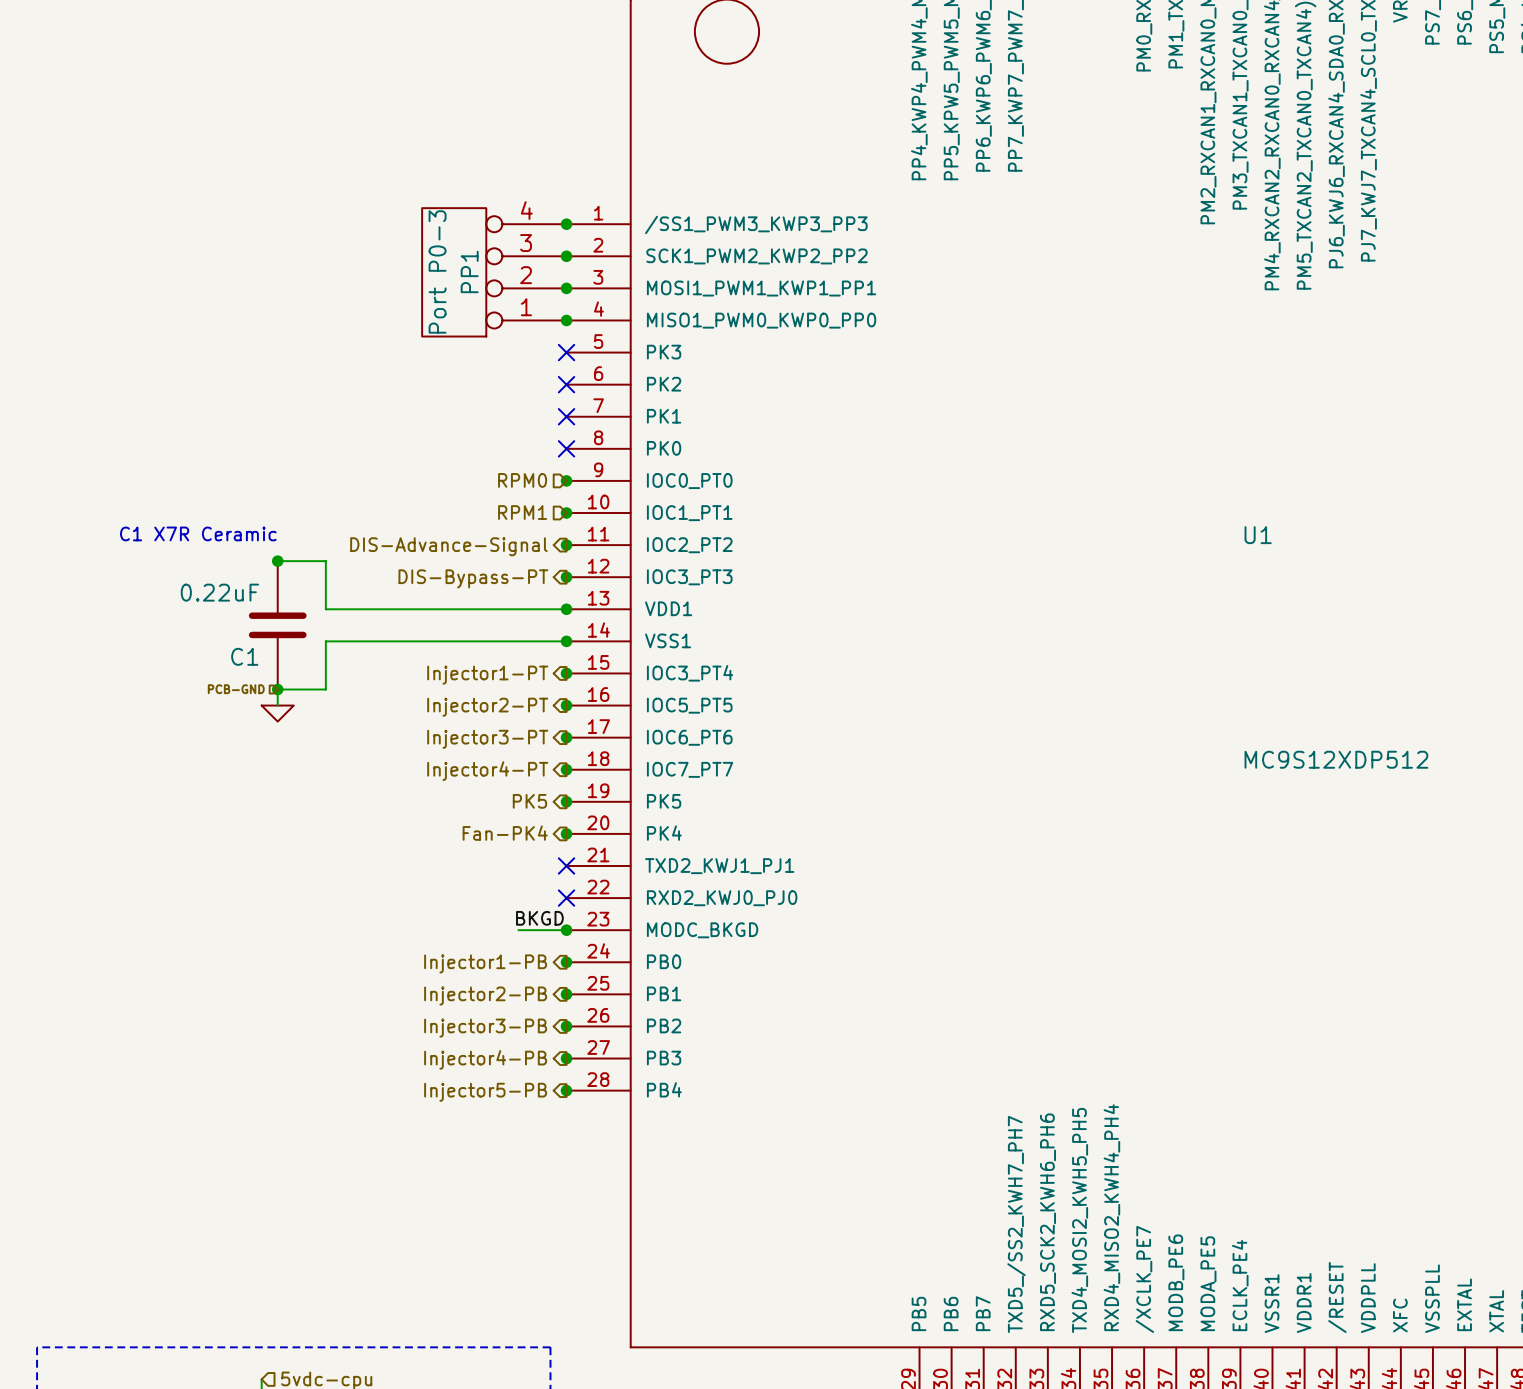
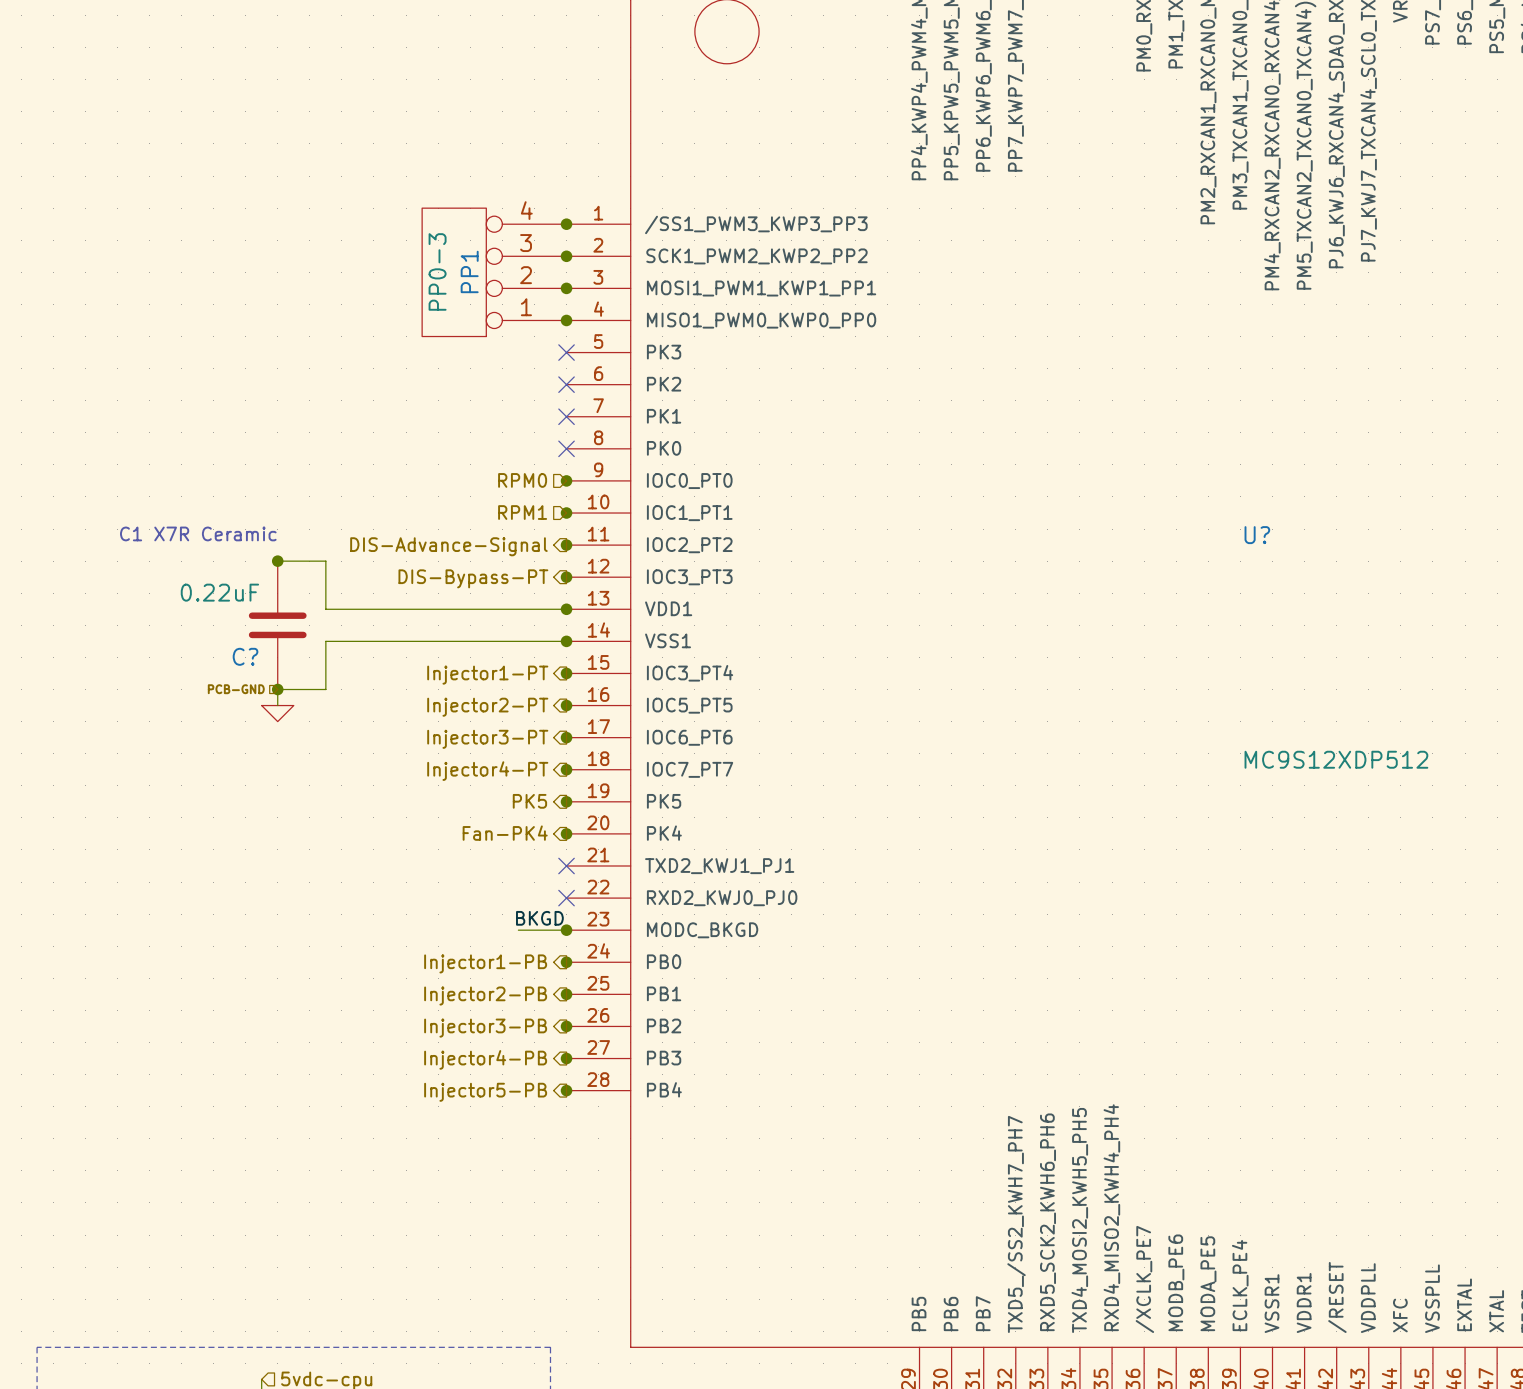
PP1 value: Port P0-3 (437, 271) -> PP0-3 (437, 271)
U1 name: U1 (1258, 535) -> U? (1257, 535)
C1 name: C1 (244, 656) -> C? (245, 656)

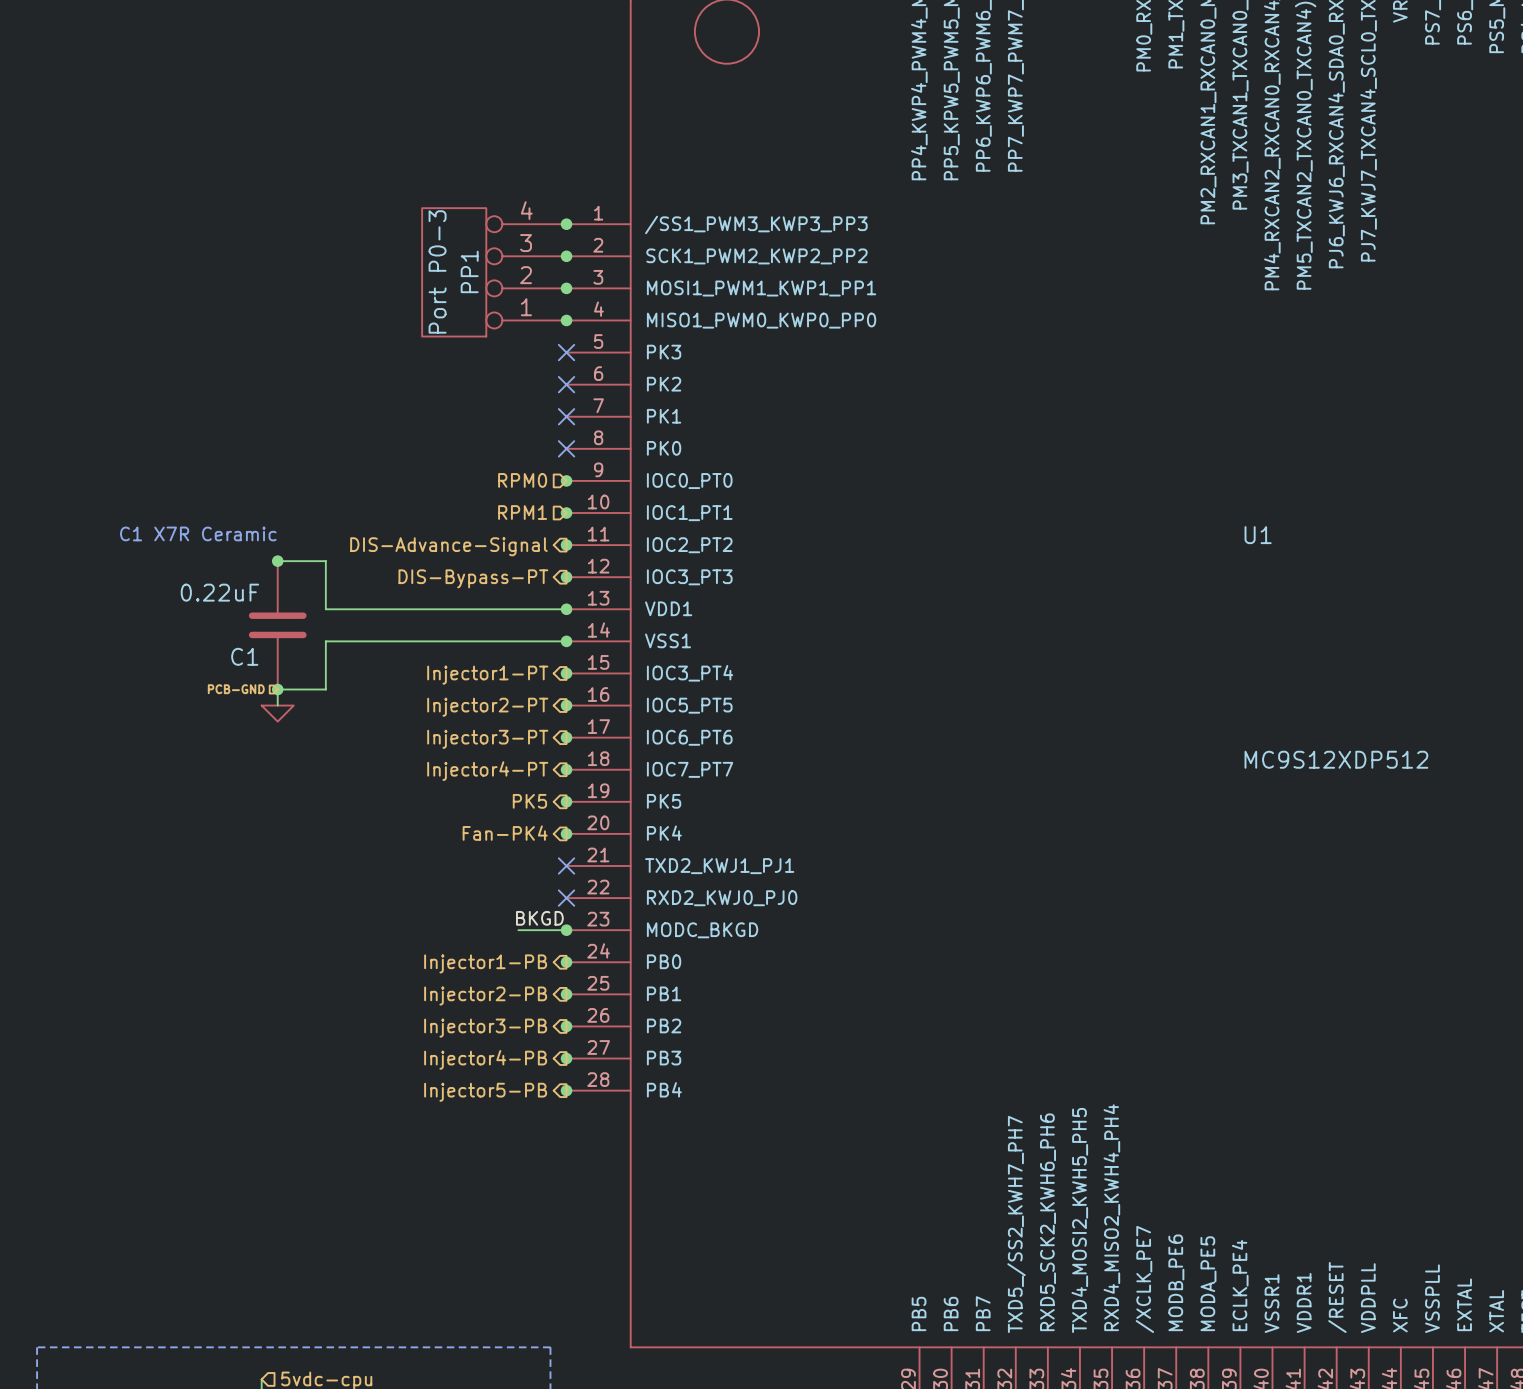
PP1 value: PP0-3 (437, 271) -> Port P0-3 (437, 271)
U? name: U? (1257, 535) -> U1 (1258, 535)
C? name: C? (245, 656) -> C1 (244, 656)

